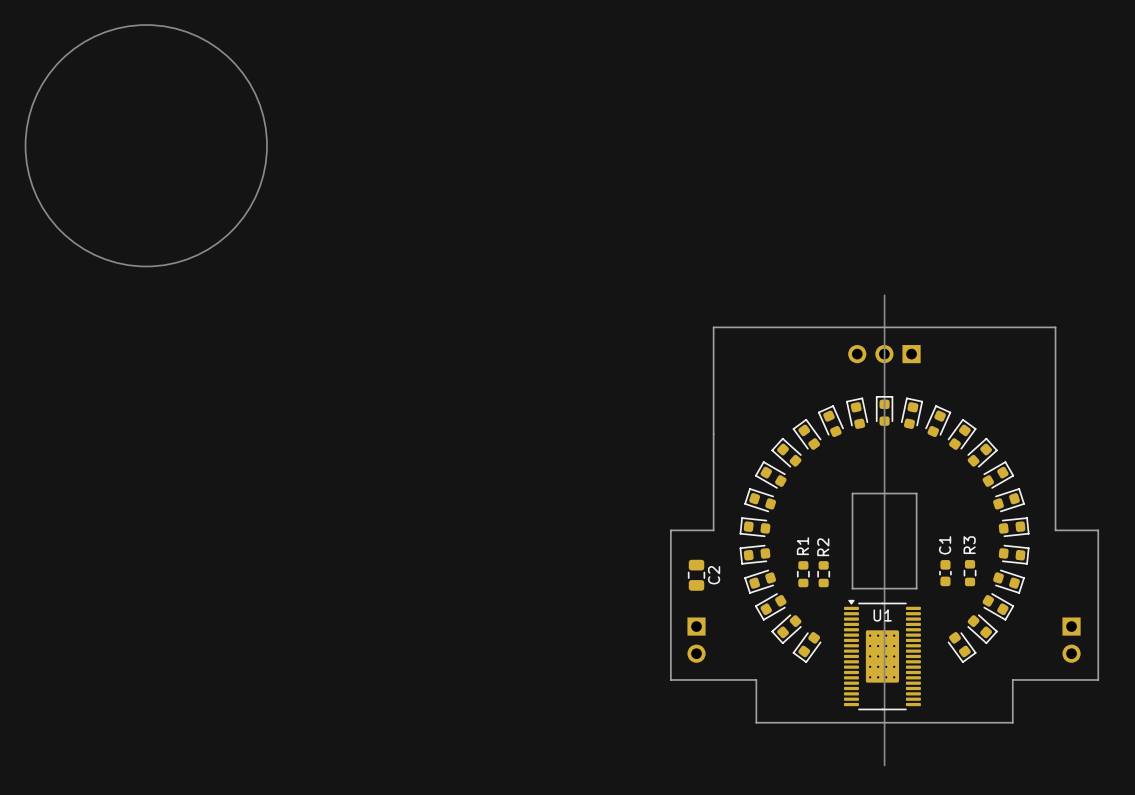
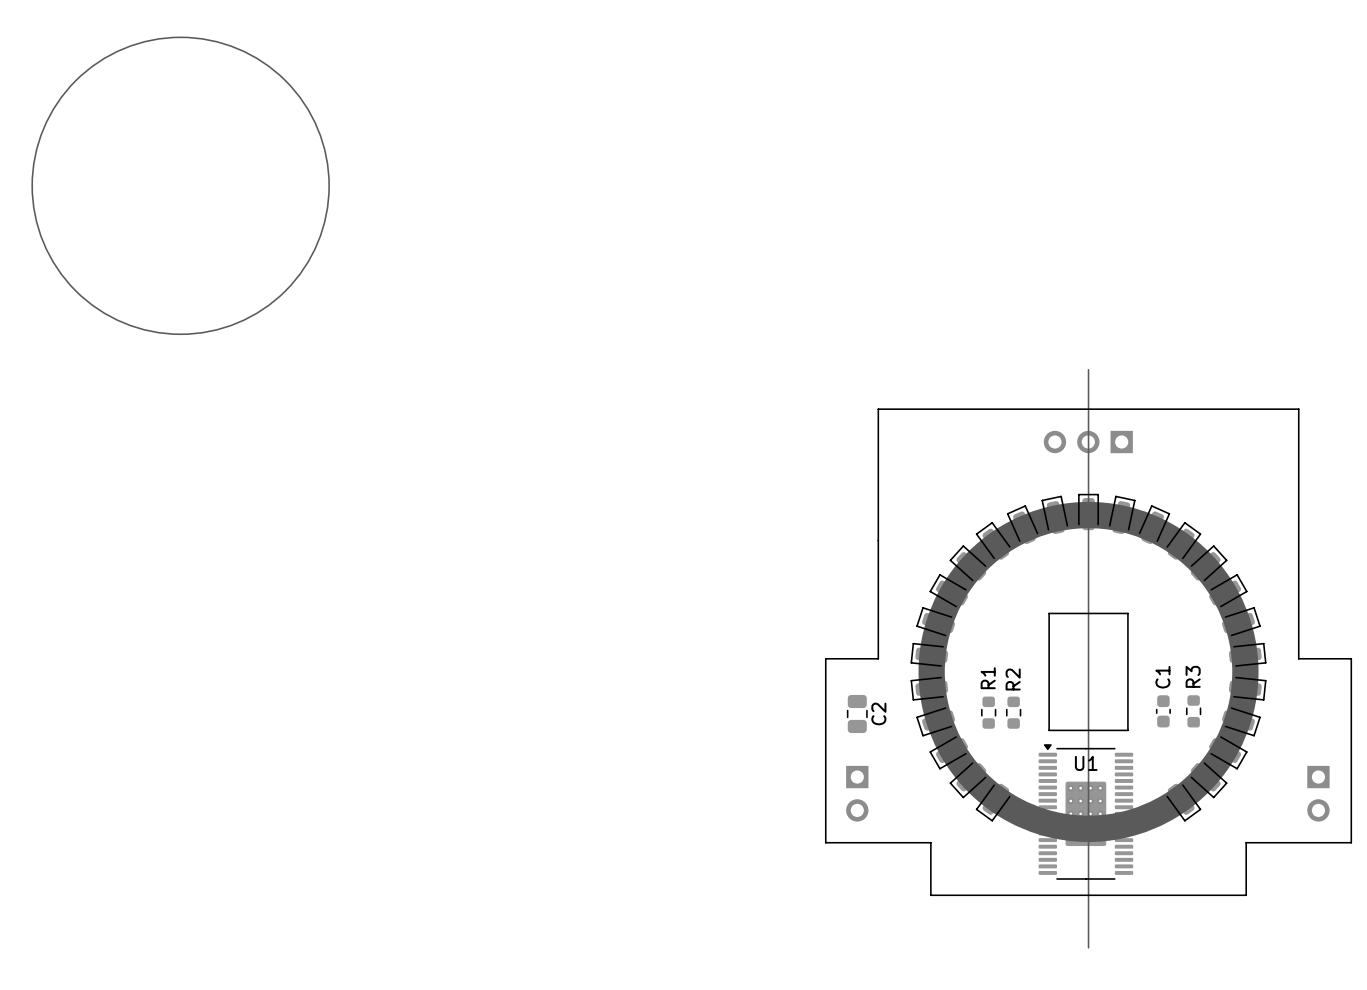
drawing: none -> [918, 501, 1259, 842]

